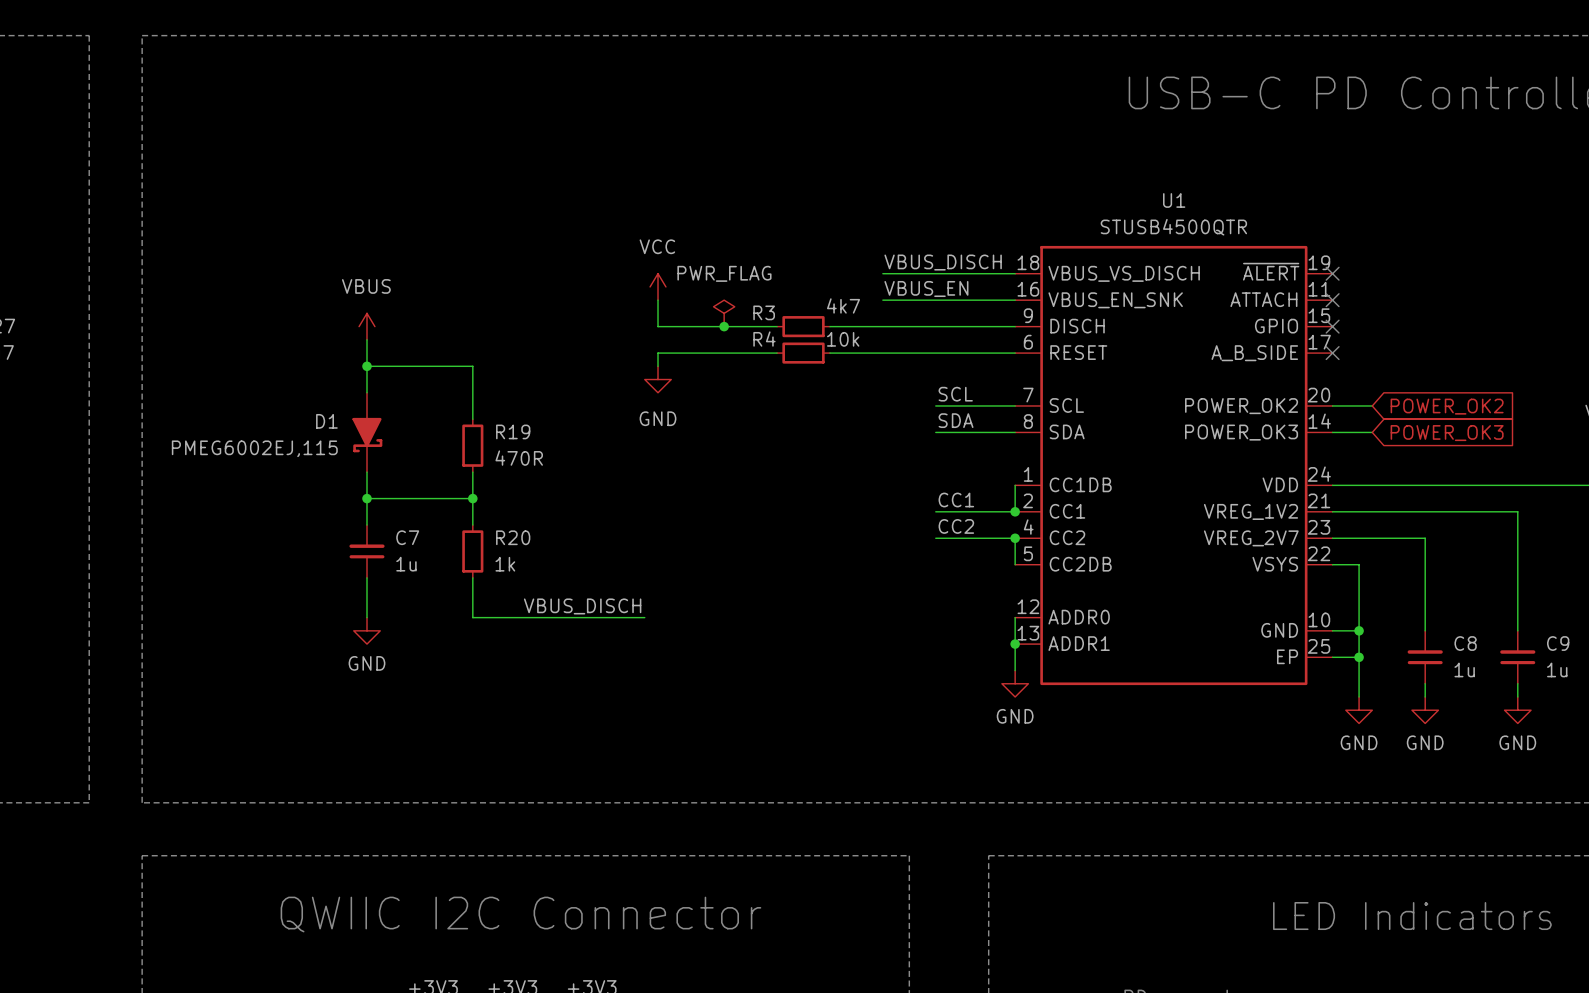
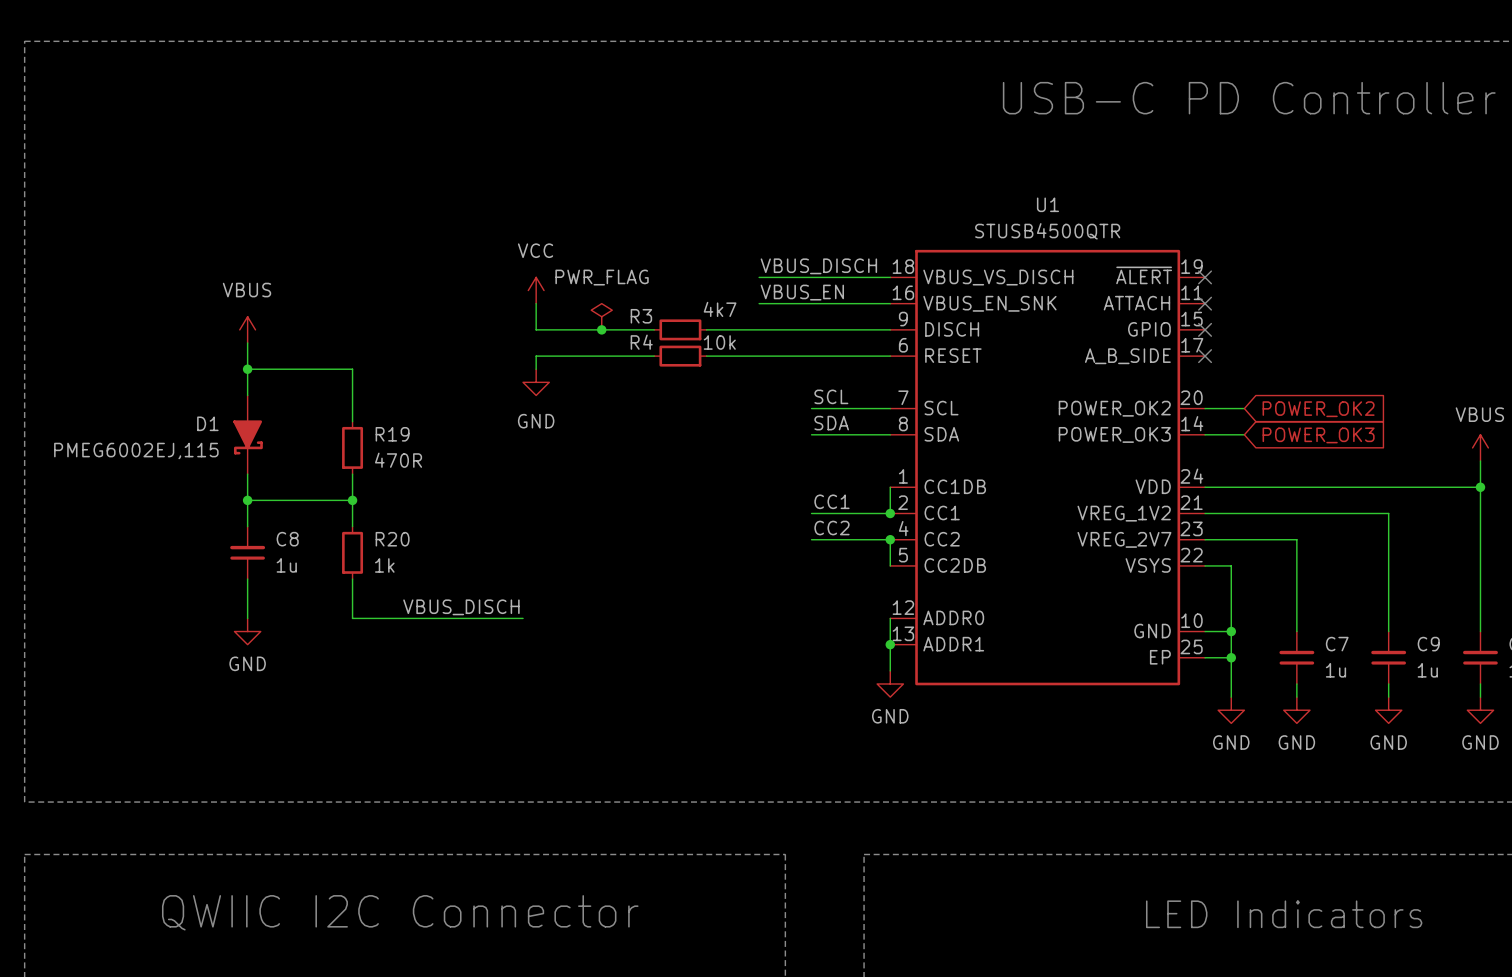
C7 name: C7 (407, 537) -> C8 (287, 539)
C8 name: C8 (1465, 643) -> C7 (1337, 644)

